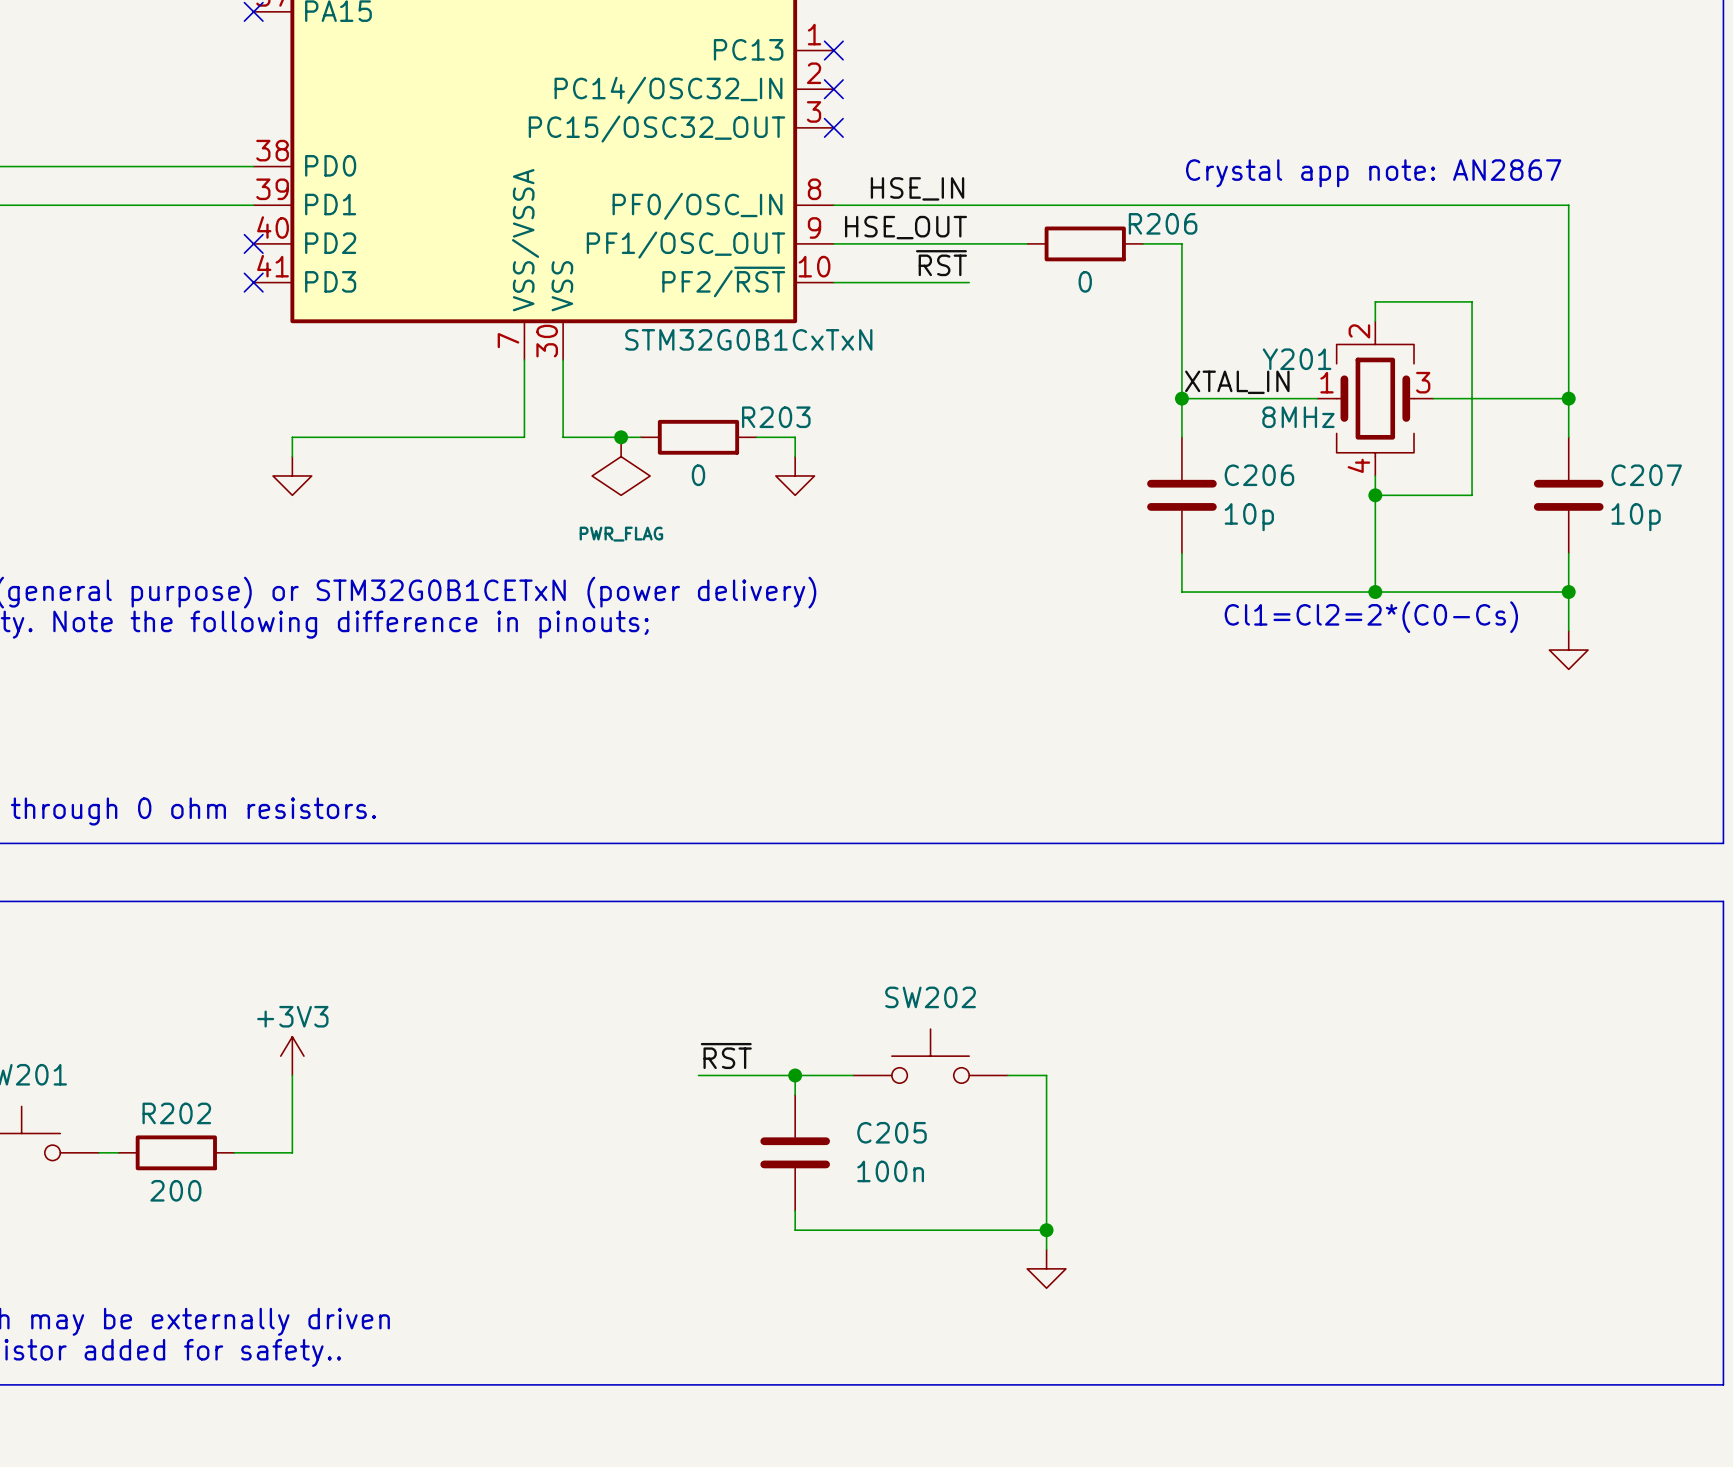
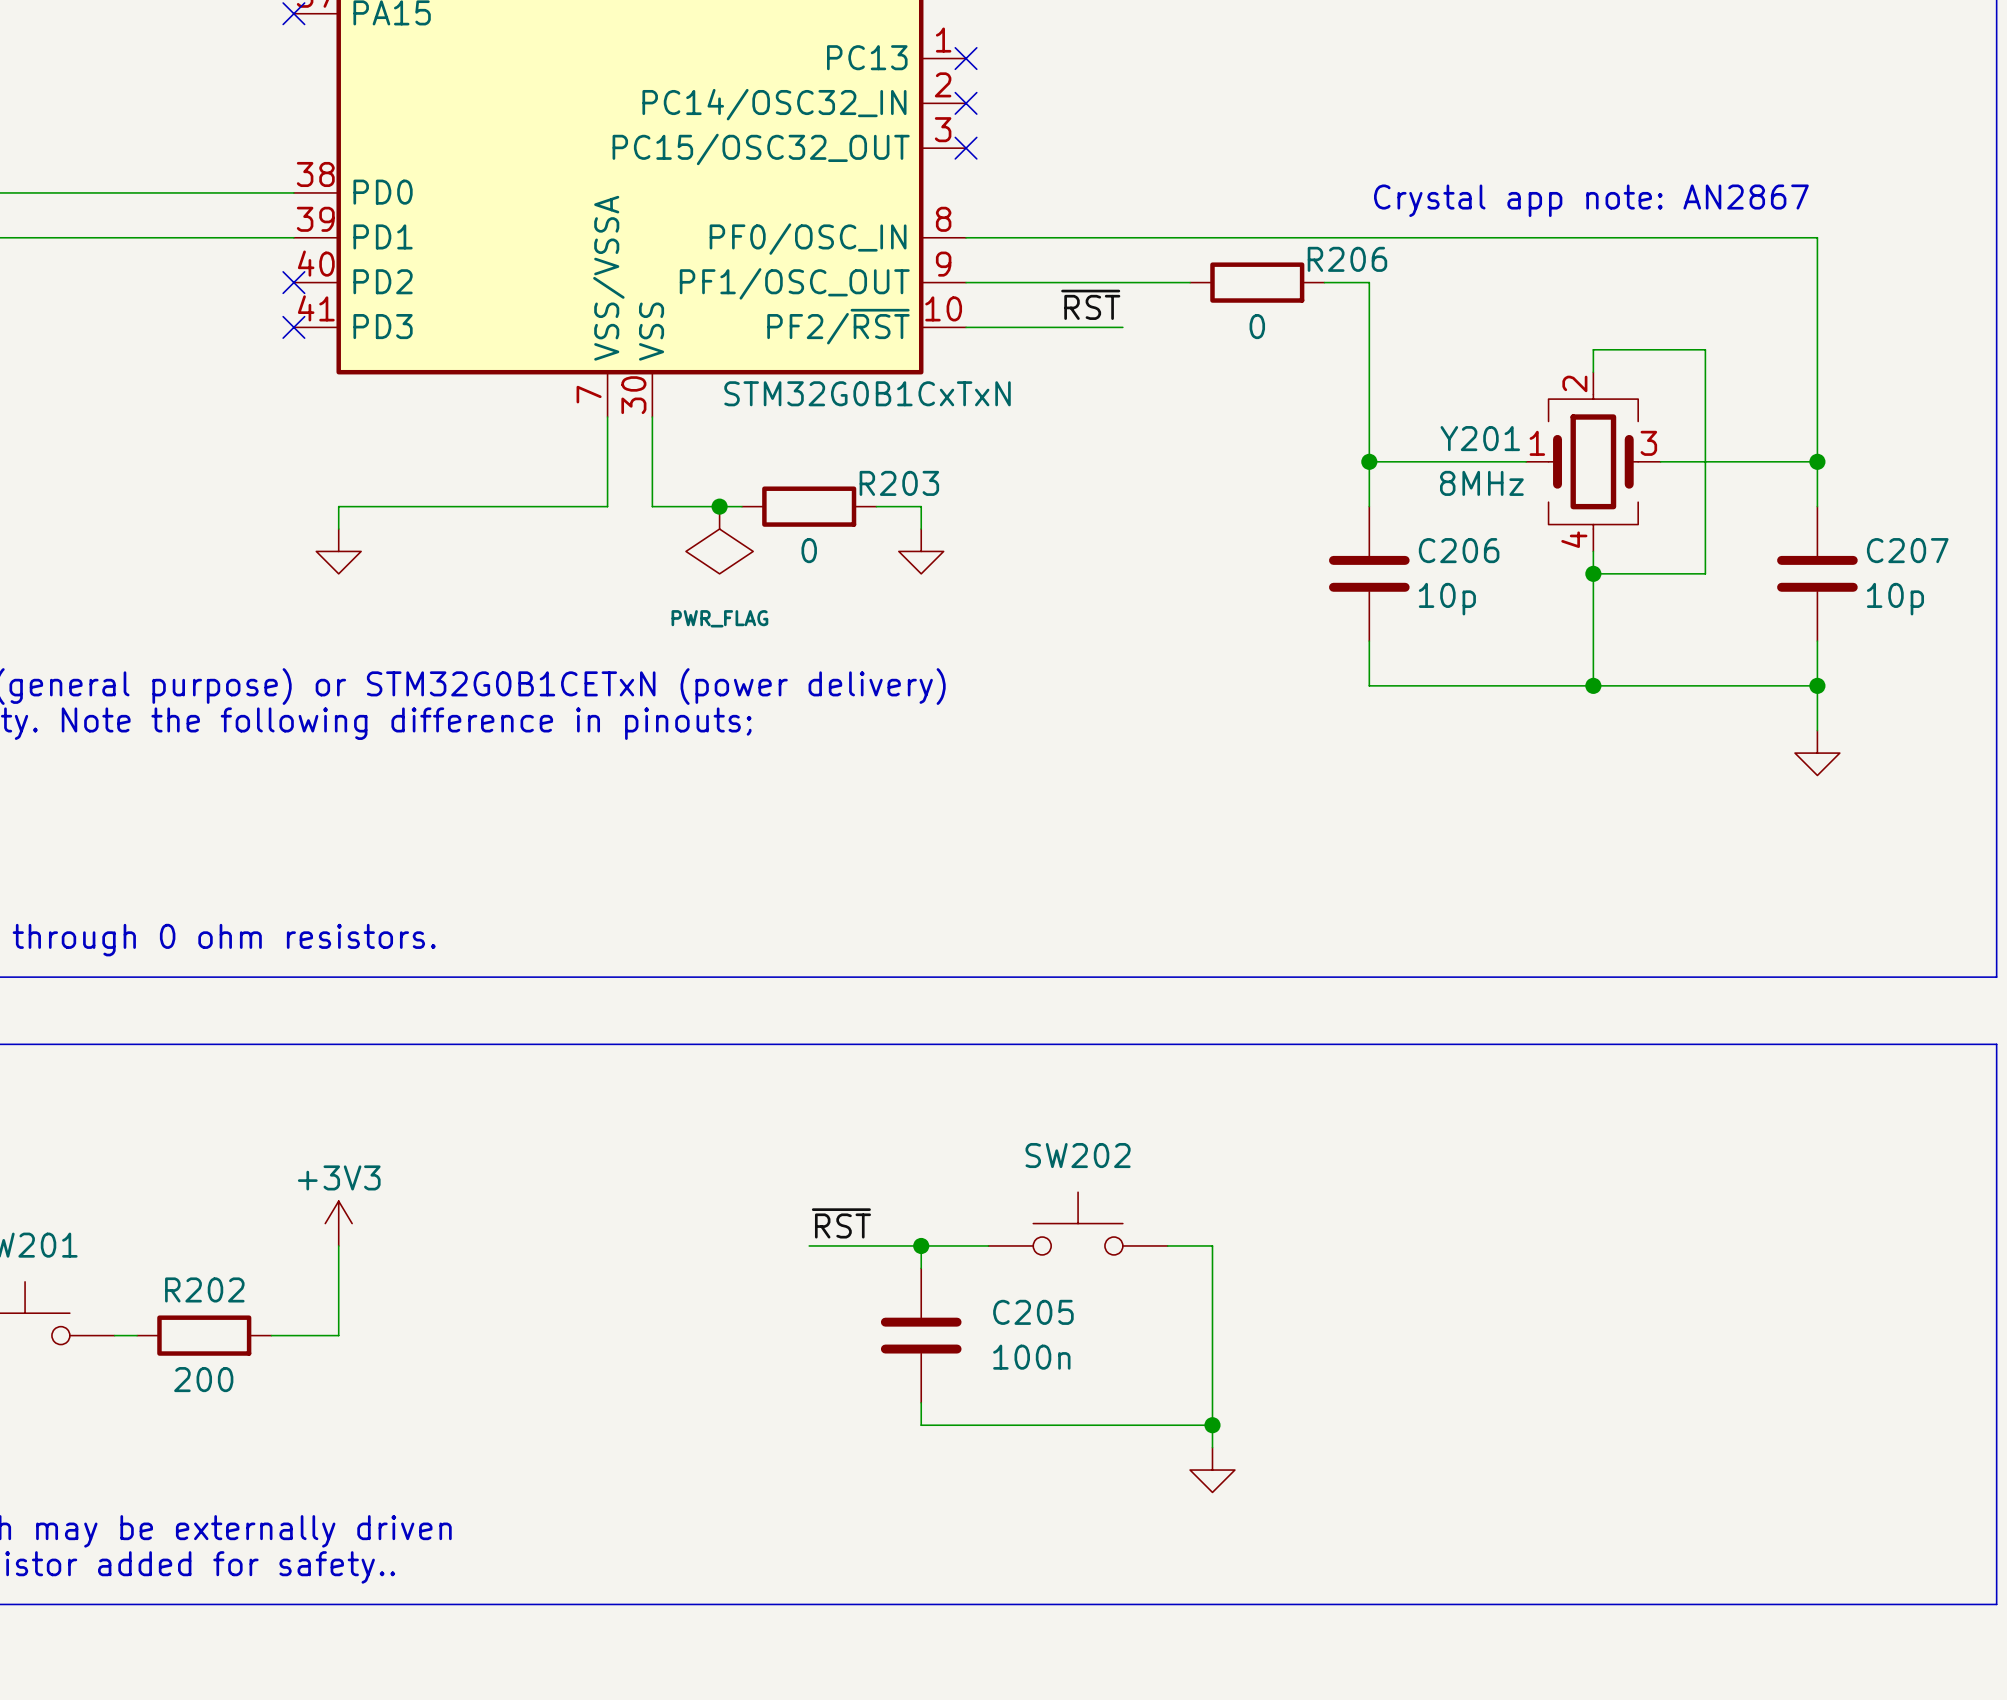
label: HSE_IN (917, 188) -> none
label: HSE_OUT (905, 227) -> none
Y201 name position: Y201 (1297, 359) -> Y201 (1480, 438)
label: XTAL_IN (1237, 382) -> none
Y201 value position: 8MHz (1298, 417) -> 8MHz (1481, 483)
text: Cl1=Cl2=2*(C0-Cs) (1371, 617) -> none

